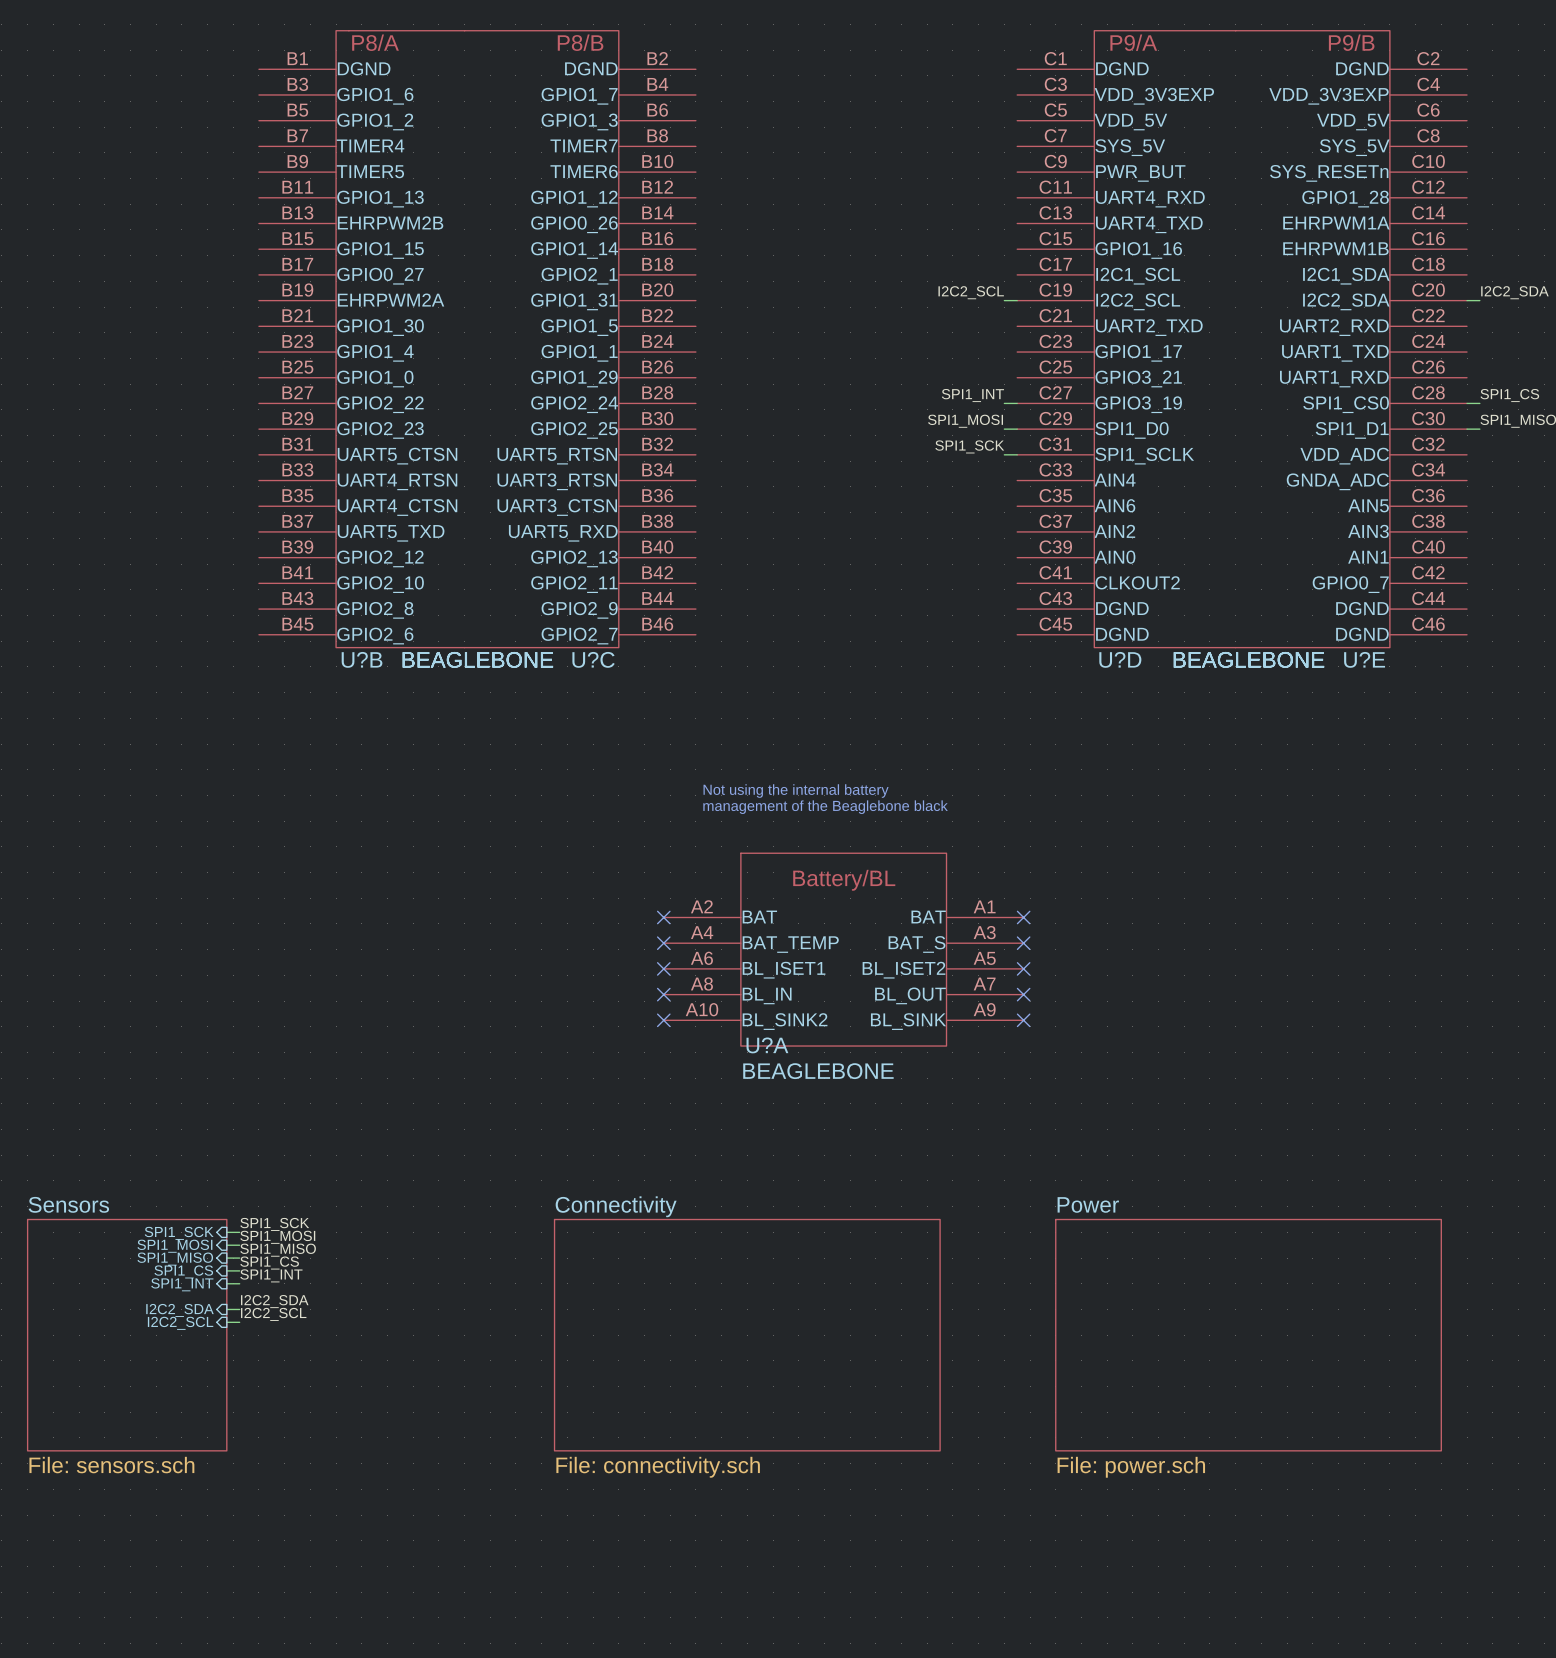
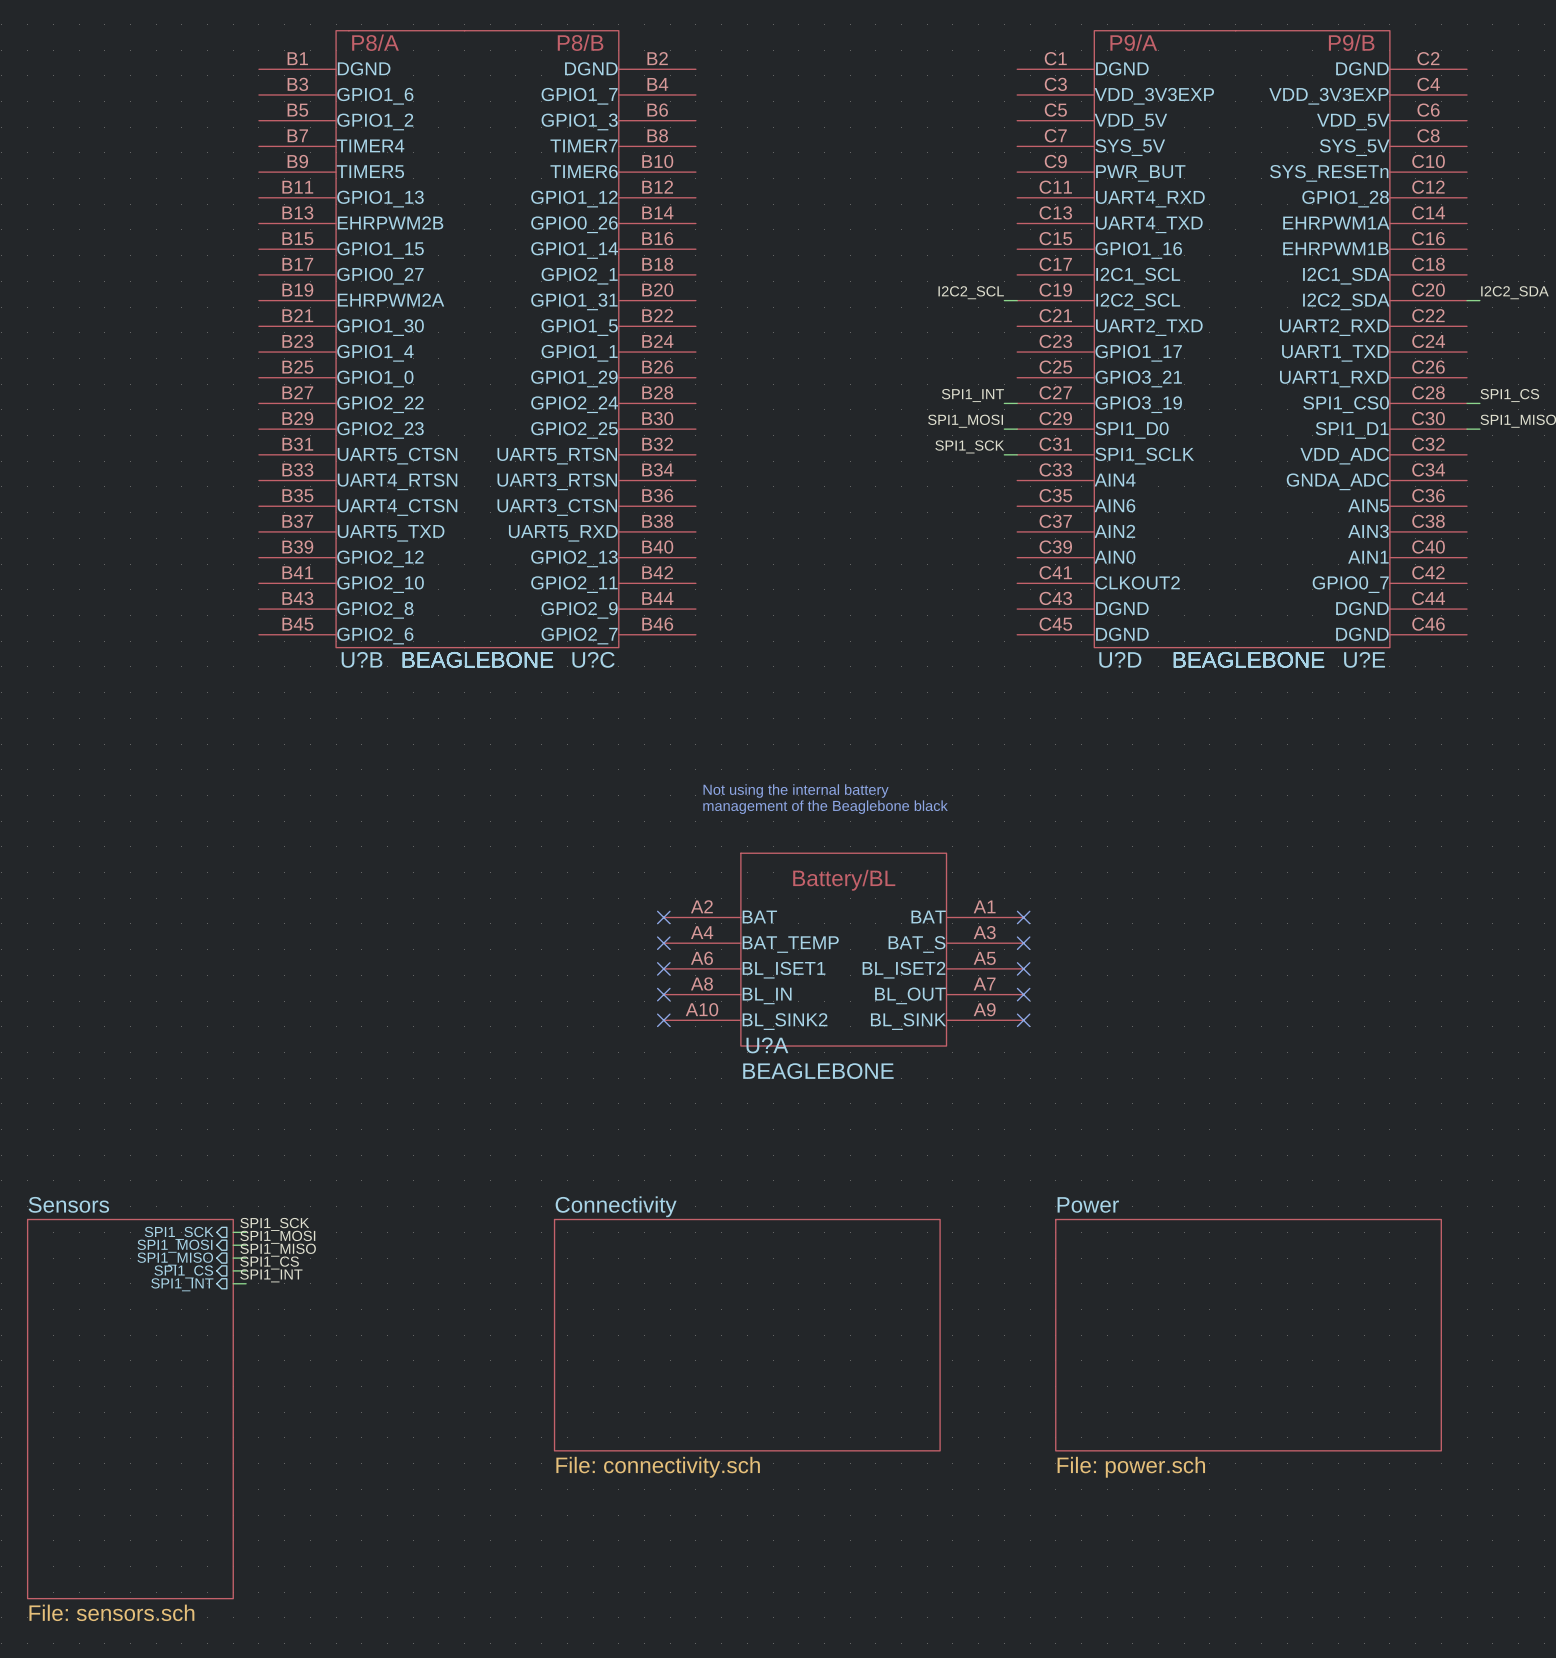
wire: (226, 1232) (233, 1232) -> (239, 1232) (246, 1232)
wire: (226, 1245) (233, 1245) -> (239, 1245) (246, 1245)
wire: (226, 1258) (233, 1258) -> (239, 1258) (246, 1258)
wire: (226, 1270) (233, 1270) -> (239, 1270) (246, 1270)
wire: (226, 1283) (233, 1283) -> (239, 1283) (246, 1283)
label: I2C2_SDA (274, 1301) -> none
wire: (226, 1309) (239, 1309) -> none
sheet pin: I2C2_SDA (179, 1310) -> none
label: I2C2_SCL (273, 1314) -> none
wire: (226, 1322) (239, 1322) -> none
sheet pin: I2C2_SCL (180, 1323) -> none
sheet Sensors: File: sensors.sch (127, 1335) -> none
sheet Sensors: none -> File: sensors.sch (130, 1409)

